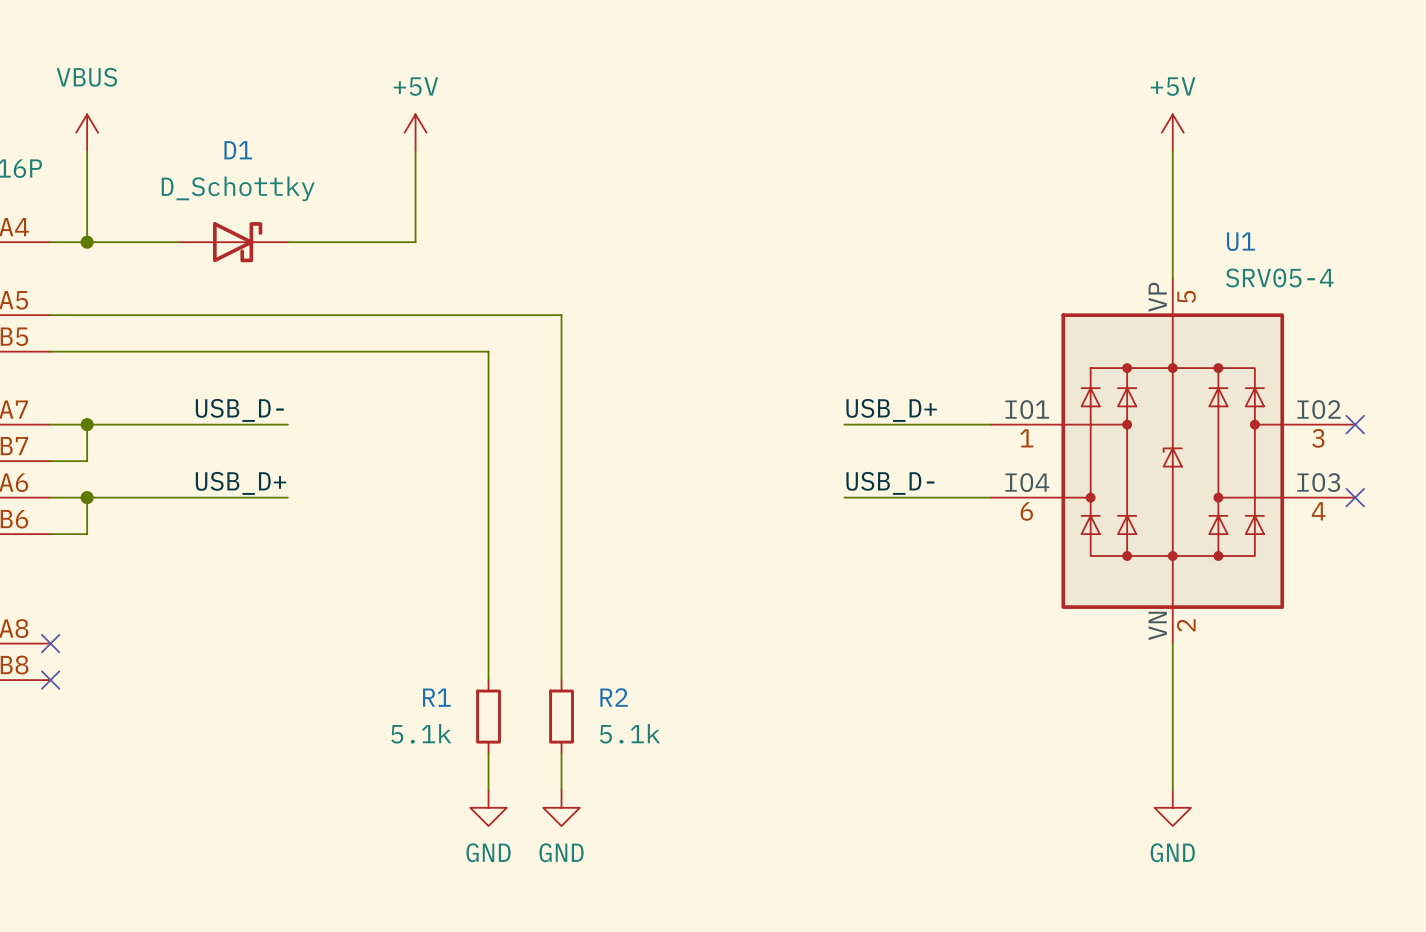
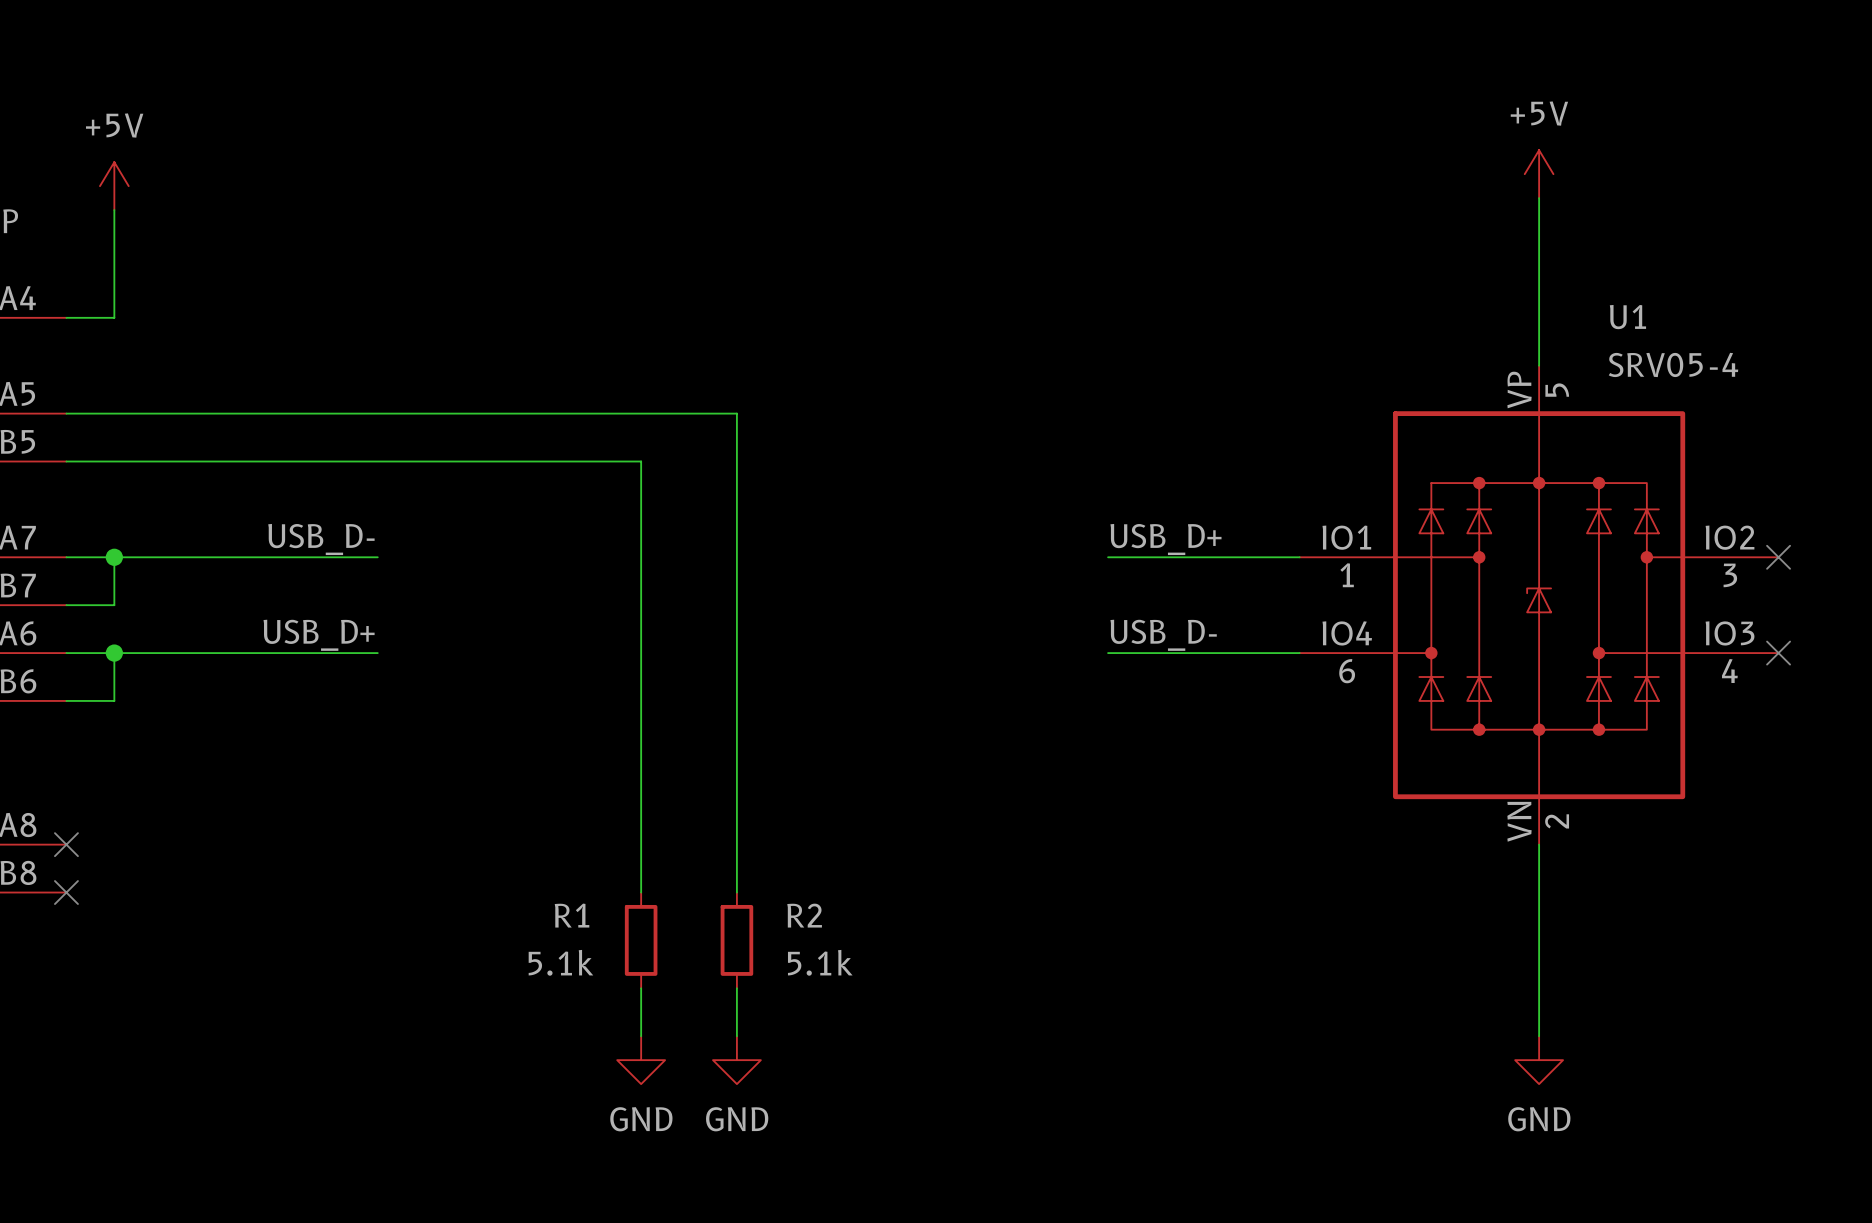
power symbol: VBUS (87, 132) -> +5V (114, 186)
power symbol: +5V (415, 132) -> none
wire: (415, 150) (415, 242) (287, 242) -> none
wire: (87, 242) (178, 242) -> none
junction: (87, 242) -> none
D1: D_Schottky (233, 242) -> none

